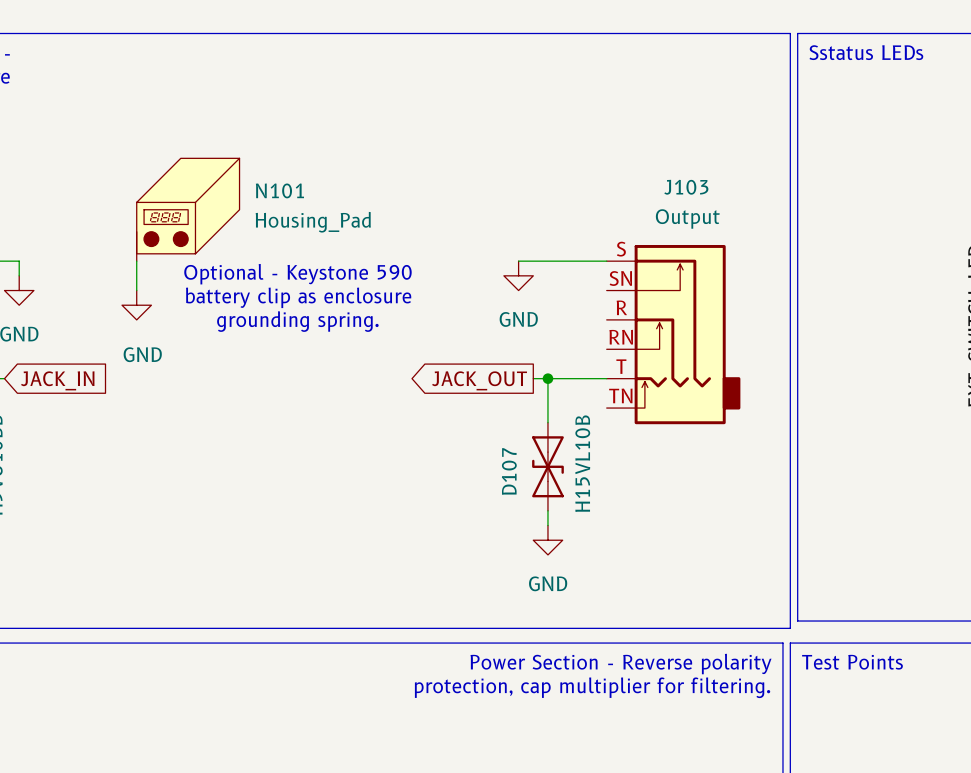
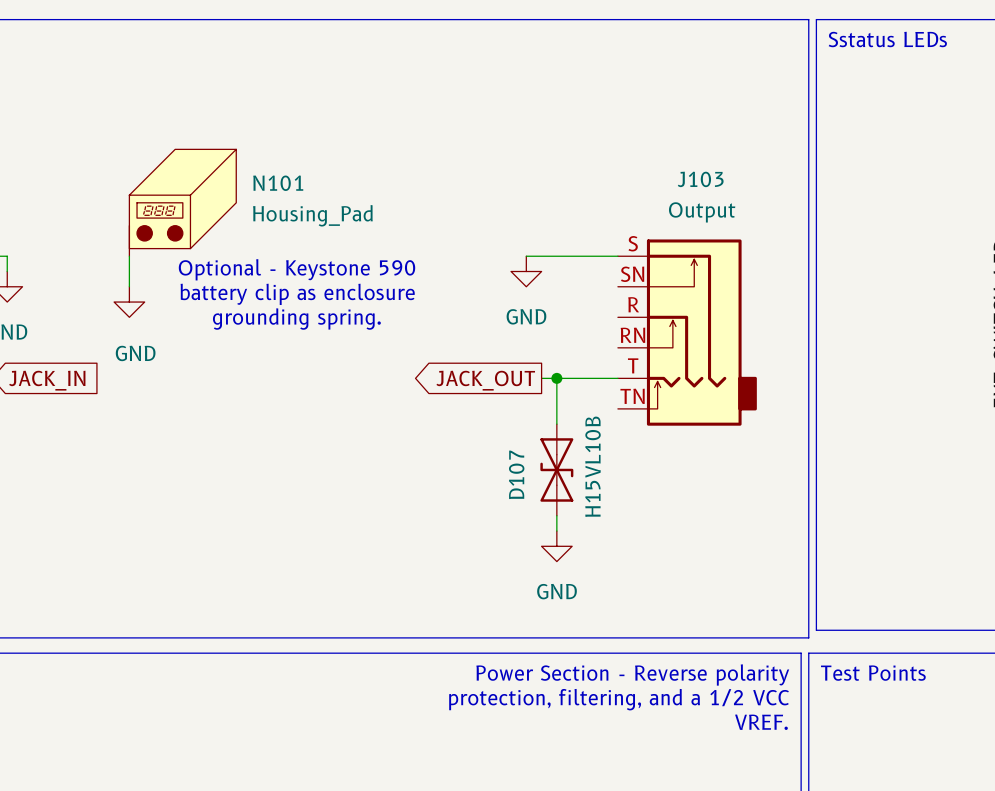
text: protection, cap multiplier for filtering. (592, 687) -> protection, filtering, and a 1/2 VCC (619, 699)
text: none -> VREF. (761, 722)

